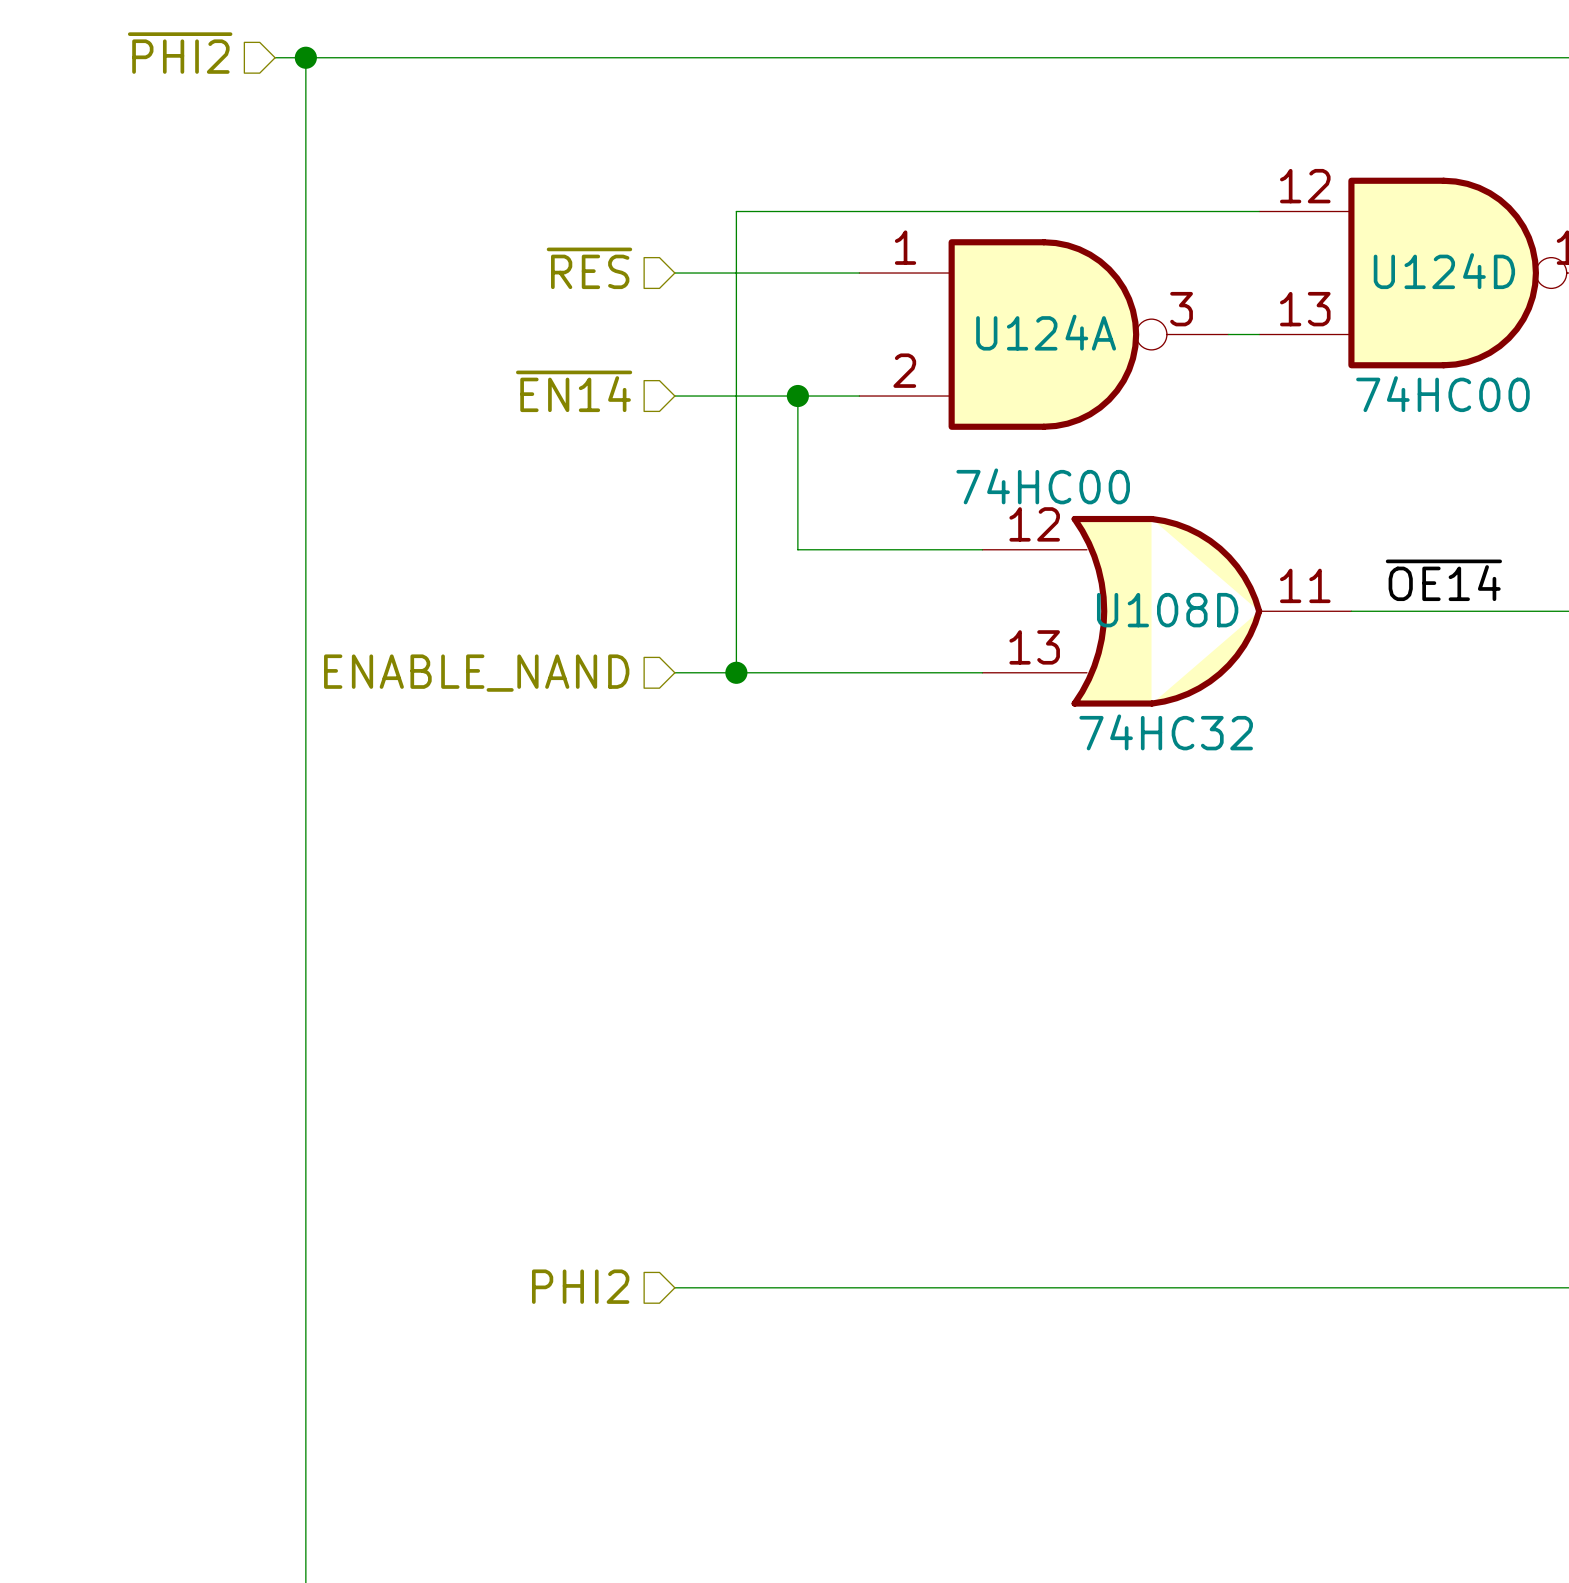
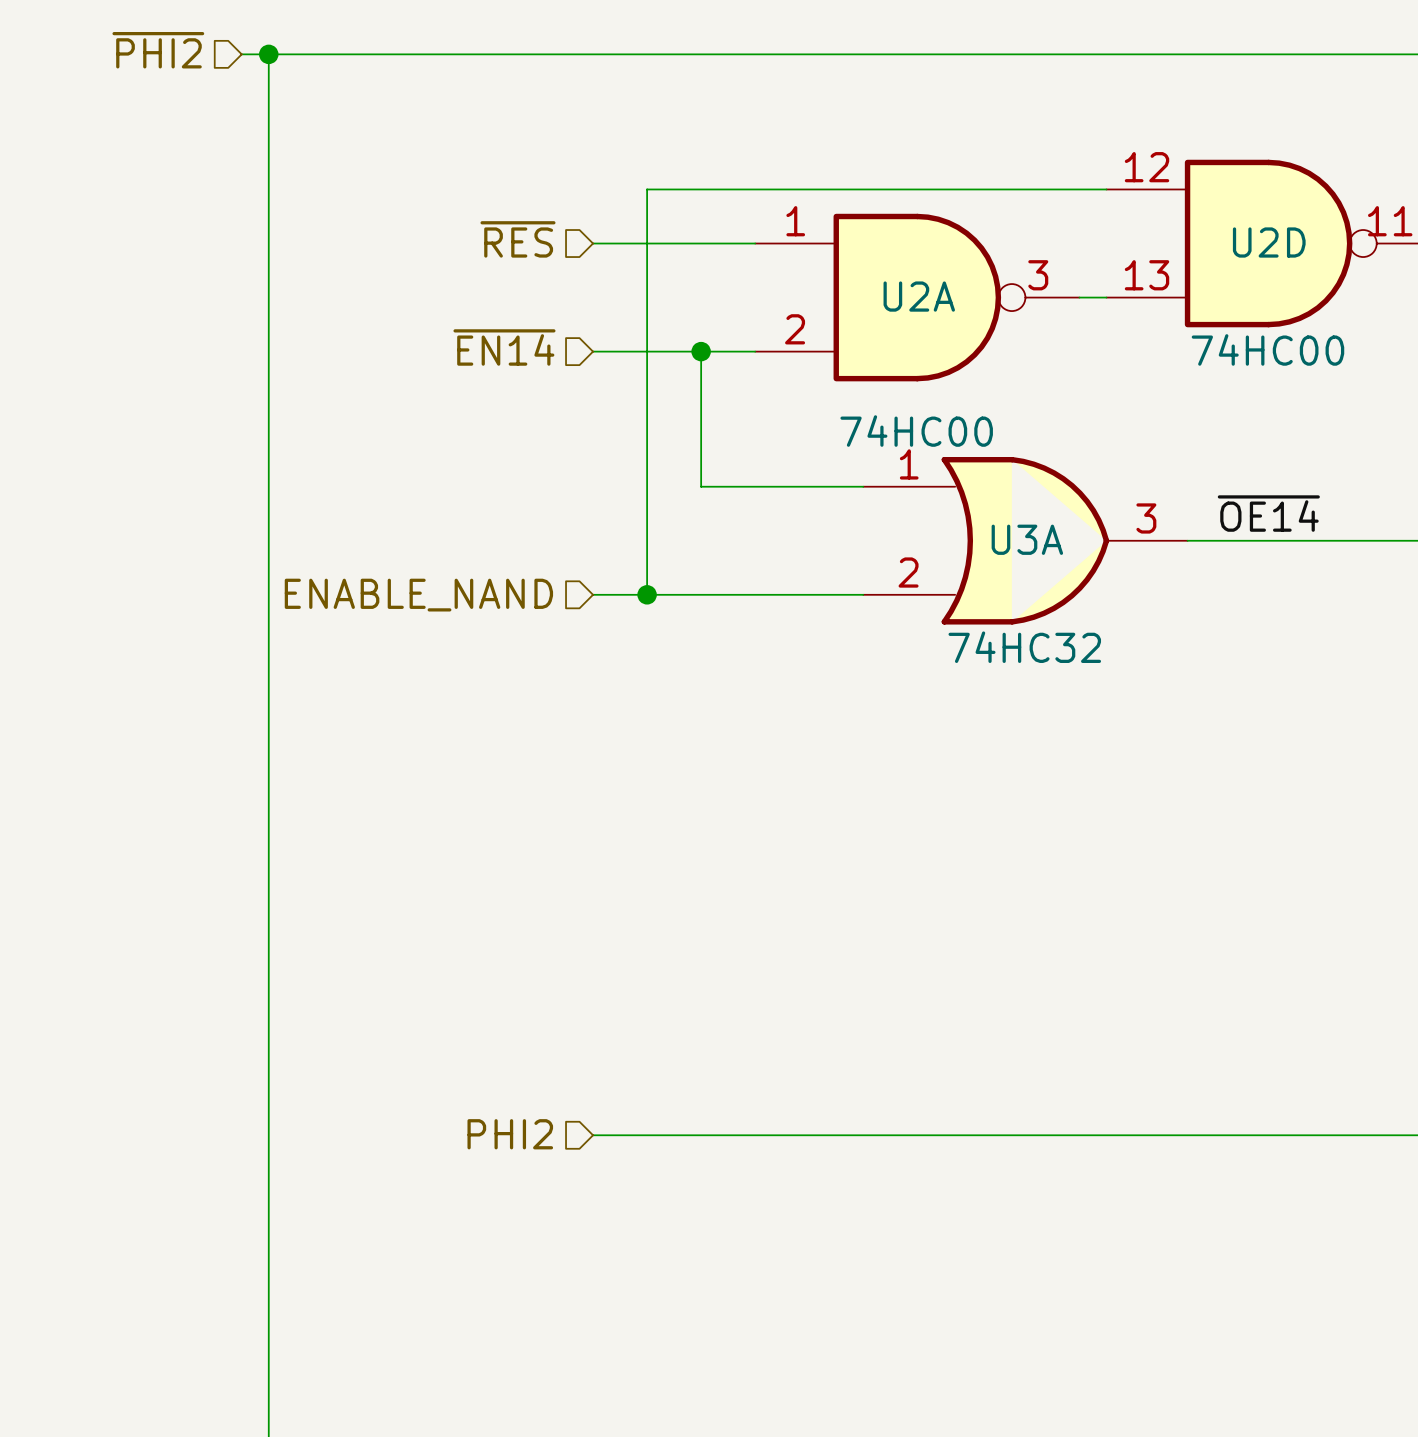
U124D name: U124D (1444, 271) -> U2D (1269, 242)
U124A name: U124A (1046, 332) -> U2A (919, 296)
U108D pin number: 12 (1034, 524) -> 1 (909, 464)
U108D pin number: 11 (1305, 585) -> 3 (1146, 518)
U108D name: U108D (1167, 610) -> U3A (1027, 539)
U108D pin number: 13 (1034, 647) -> 2 (908, 572)

